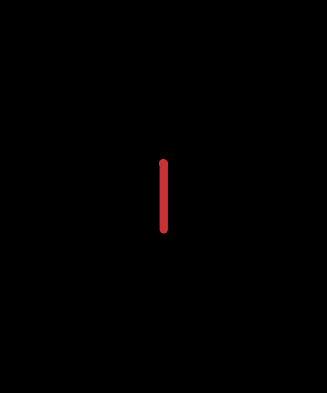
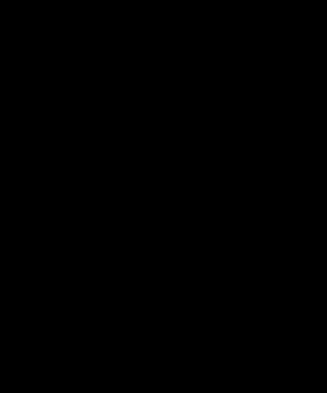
top track: (163, 163) (163, 229) -> none

